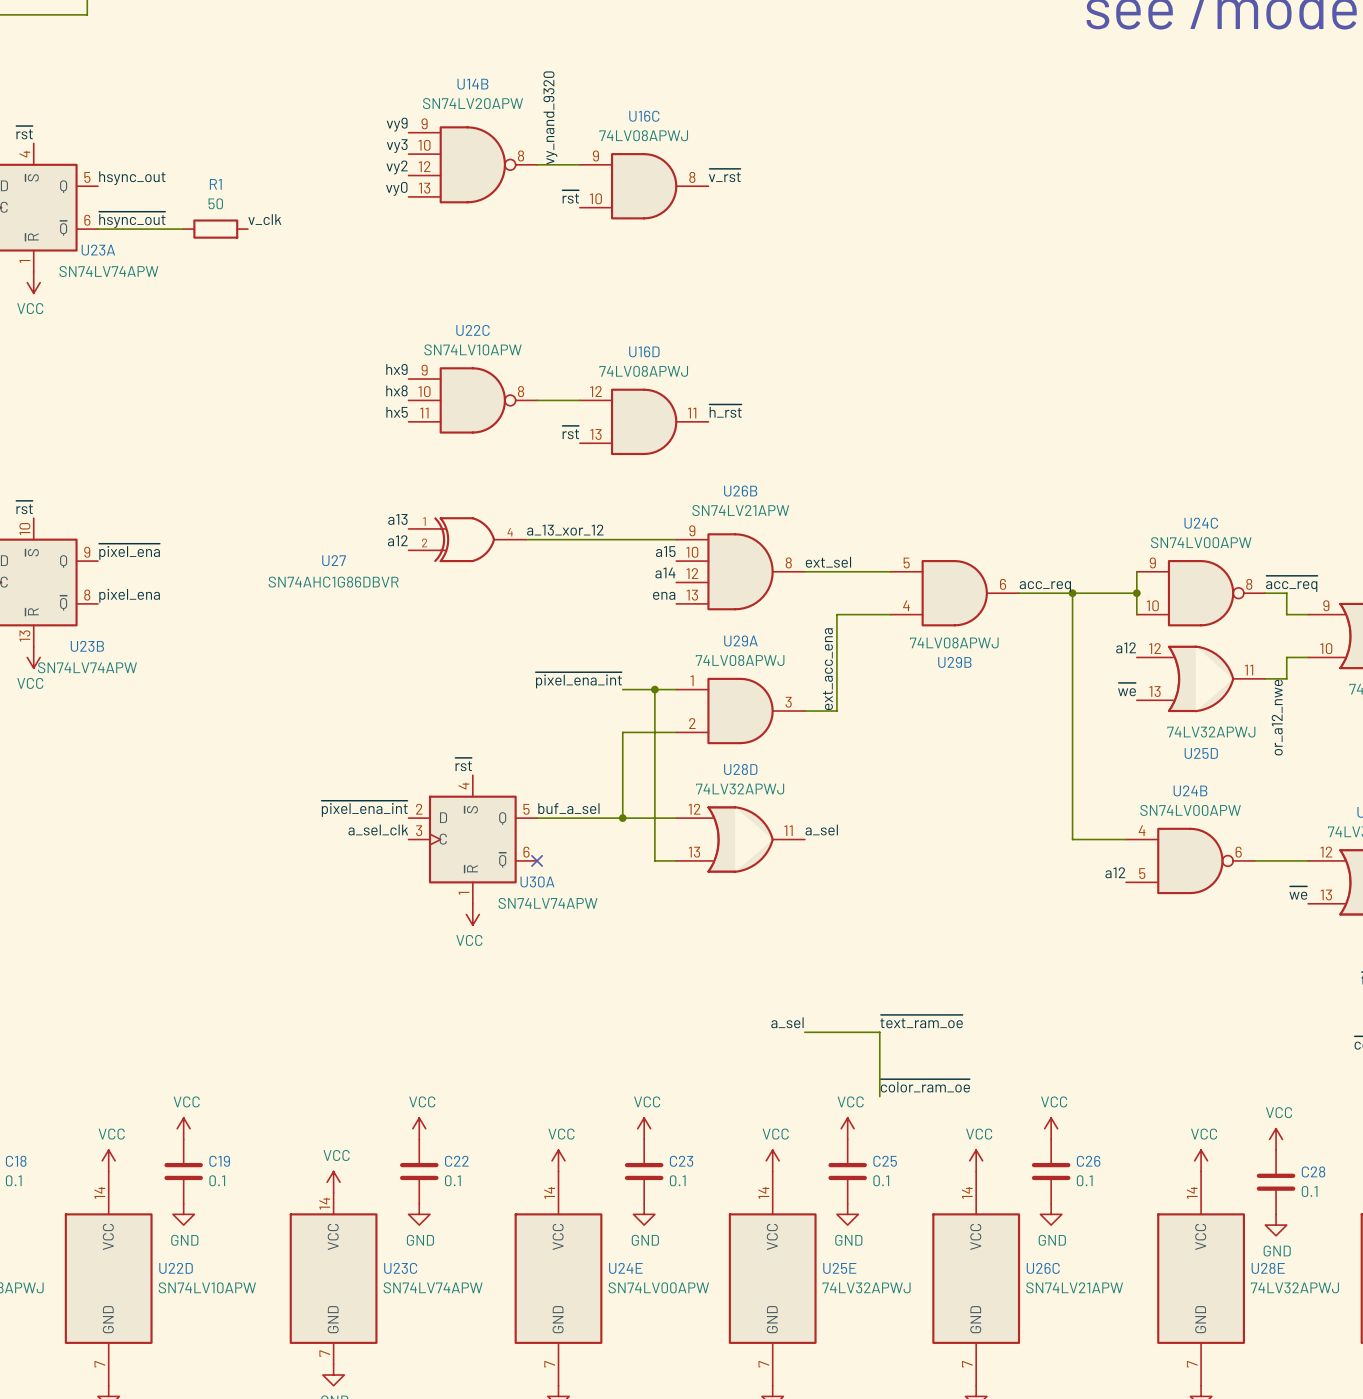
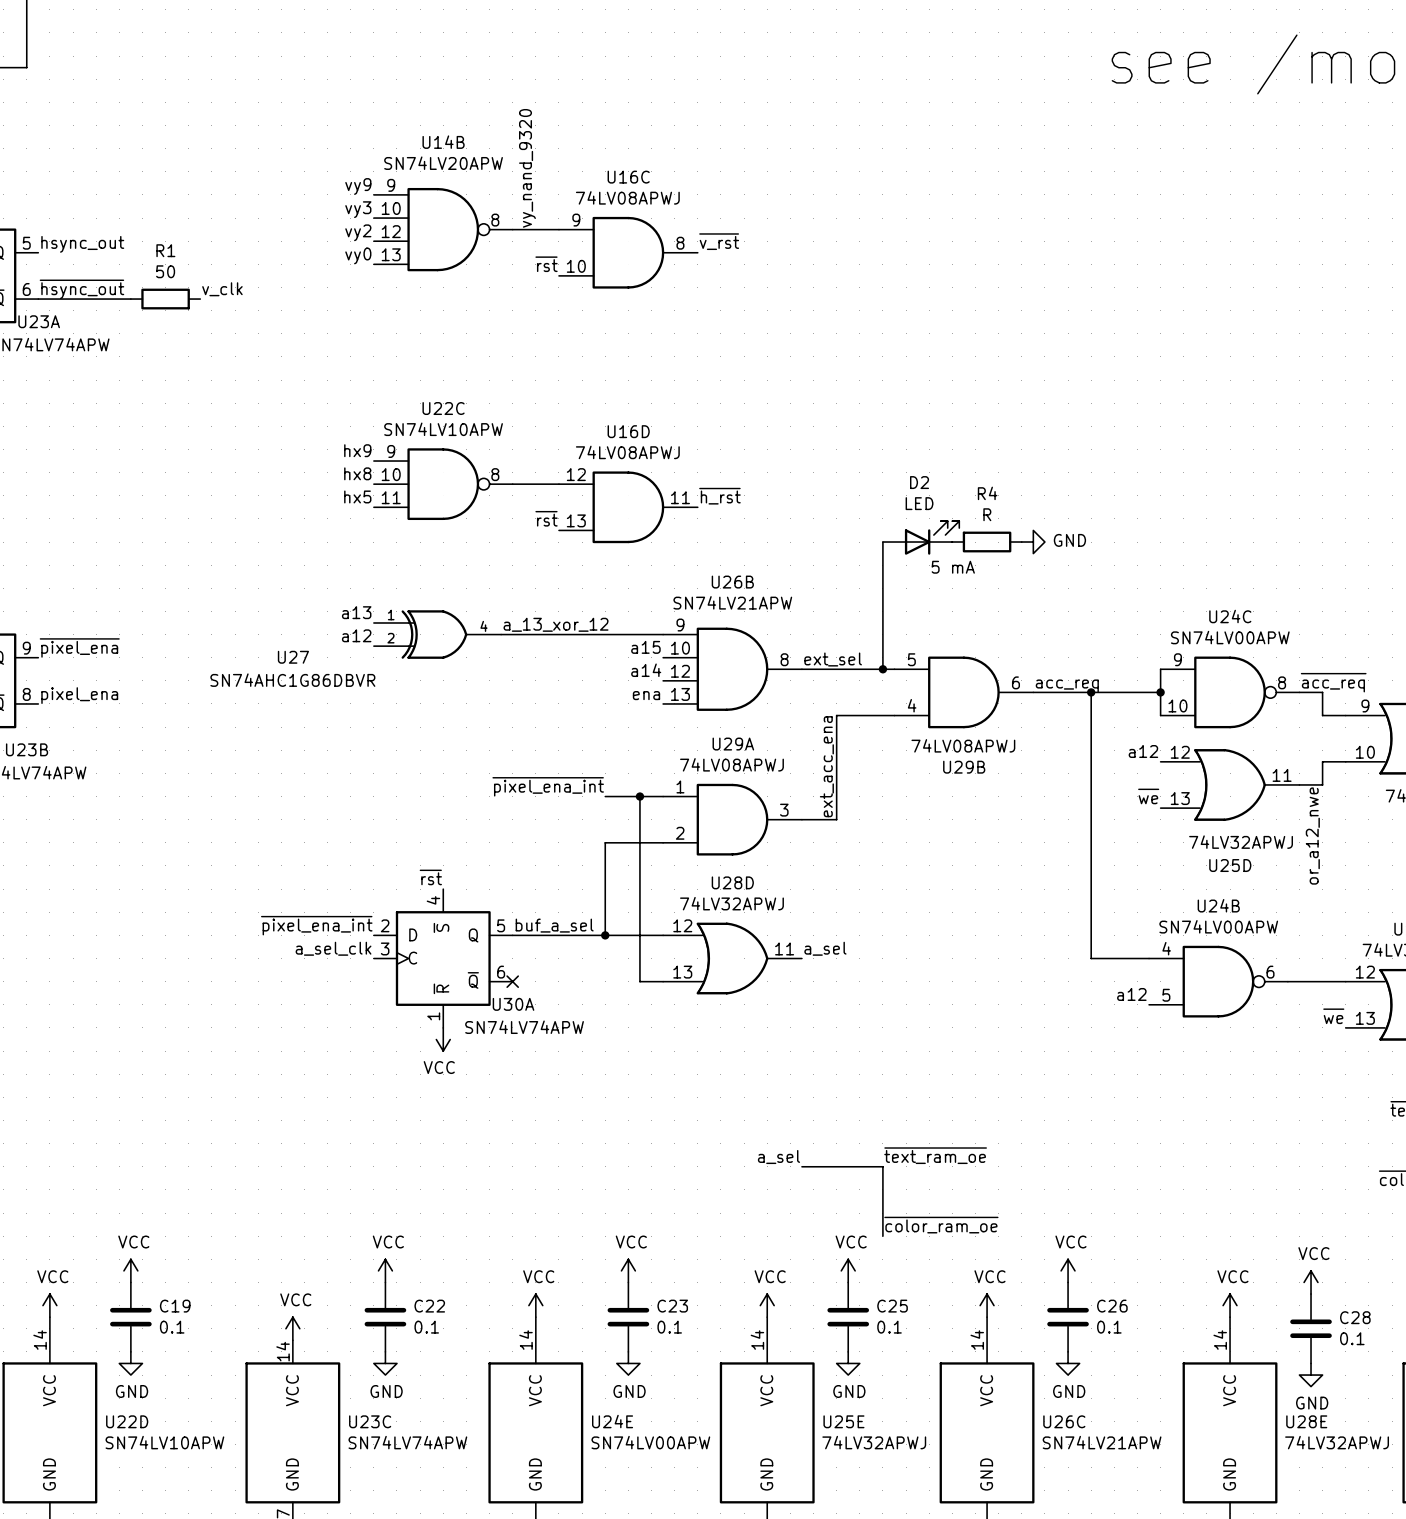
D2: none -> LED (921, 537)
wire: none -> (882, 542) (882, 669)
R4: none -> R (987, 542)
power symbol: none -> GND (1033, 542)
text: none -> 5 mA (953, 567)
junction: none -> (882, 669)

